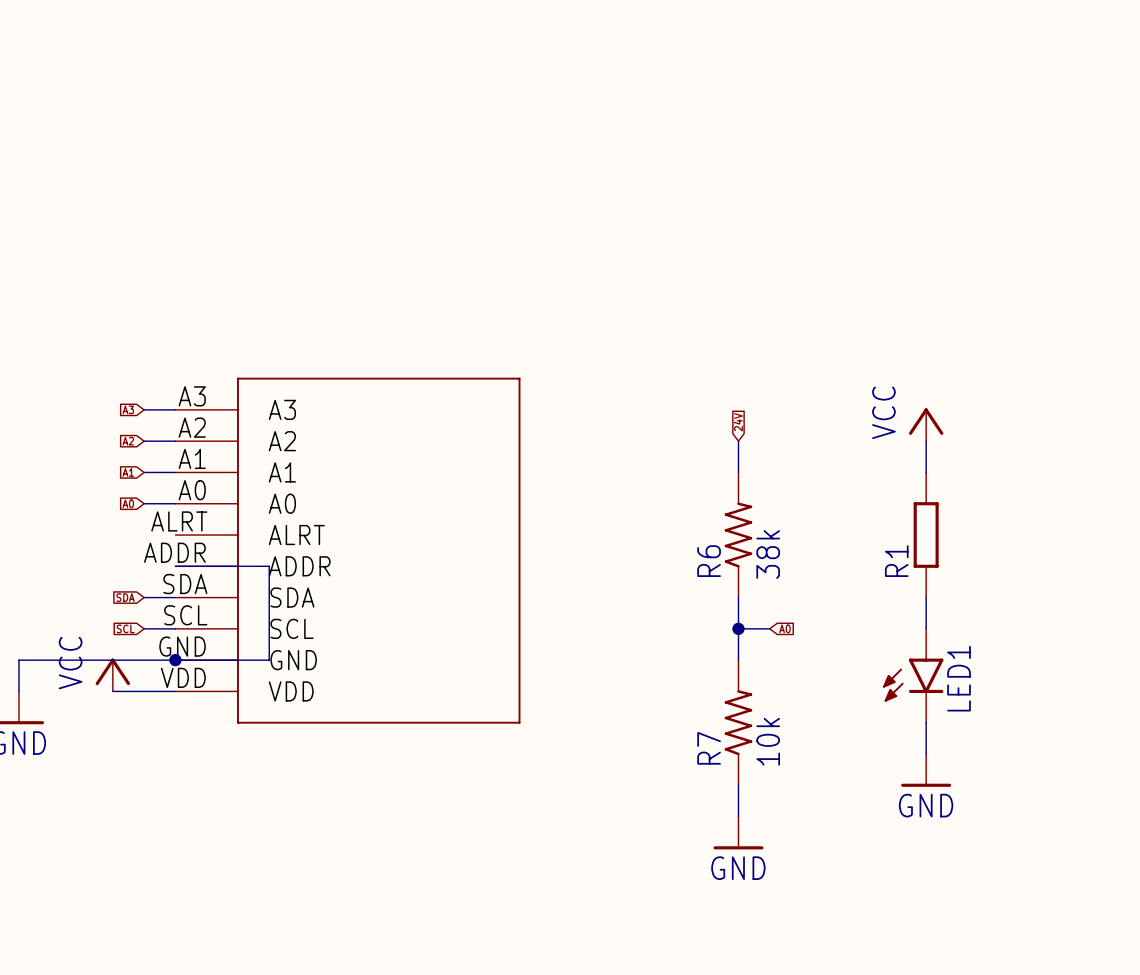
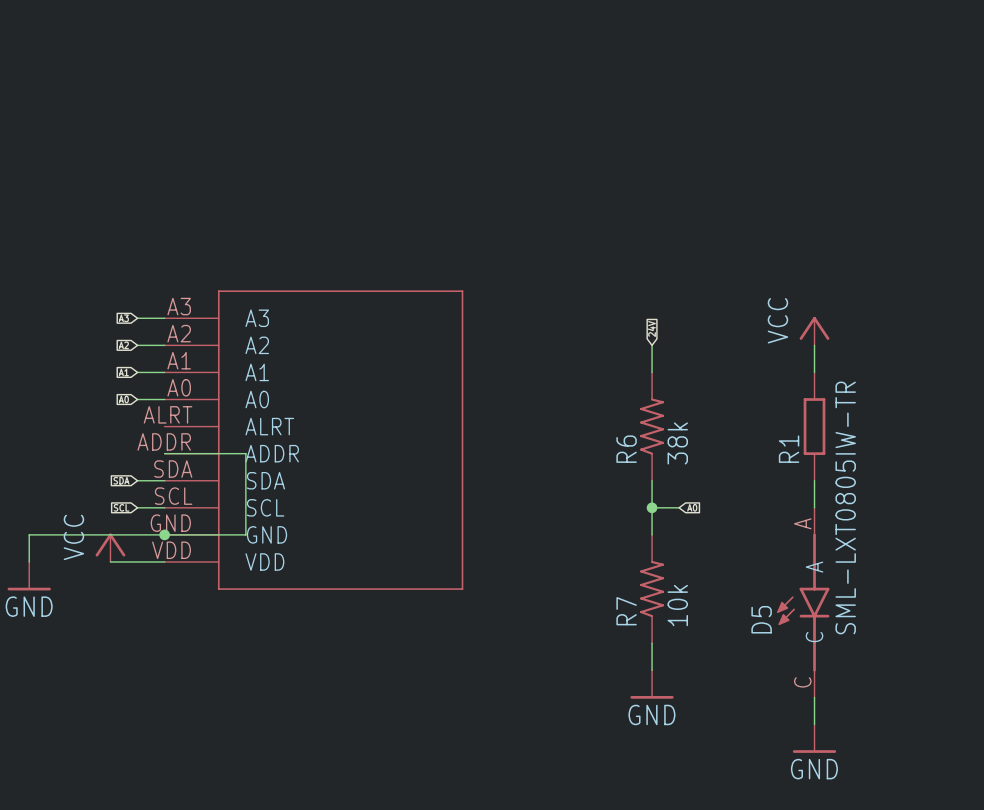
LED1: (913, 675) -> none
wire: (926, 722) (926, 753) -> (814, 697) (814, 724)
D5: none -> SML-LXT0805IW-TR (803, 602)
power symbol position: GND (926, 770) -> GND (814, 738)

